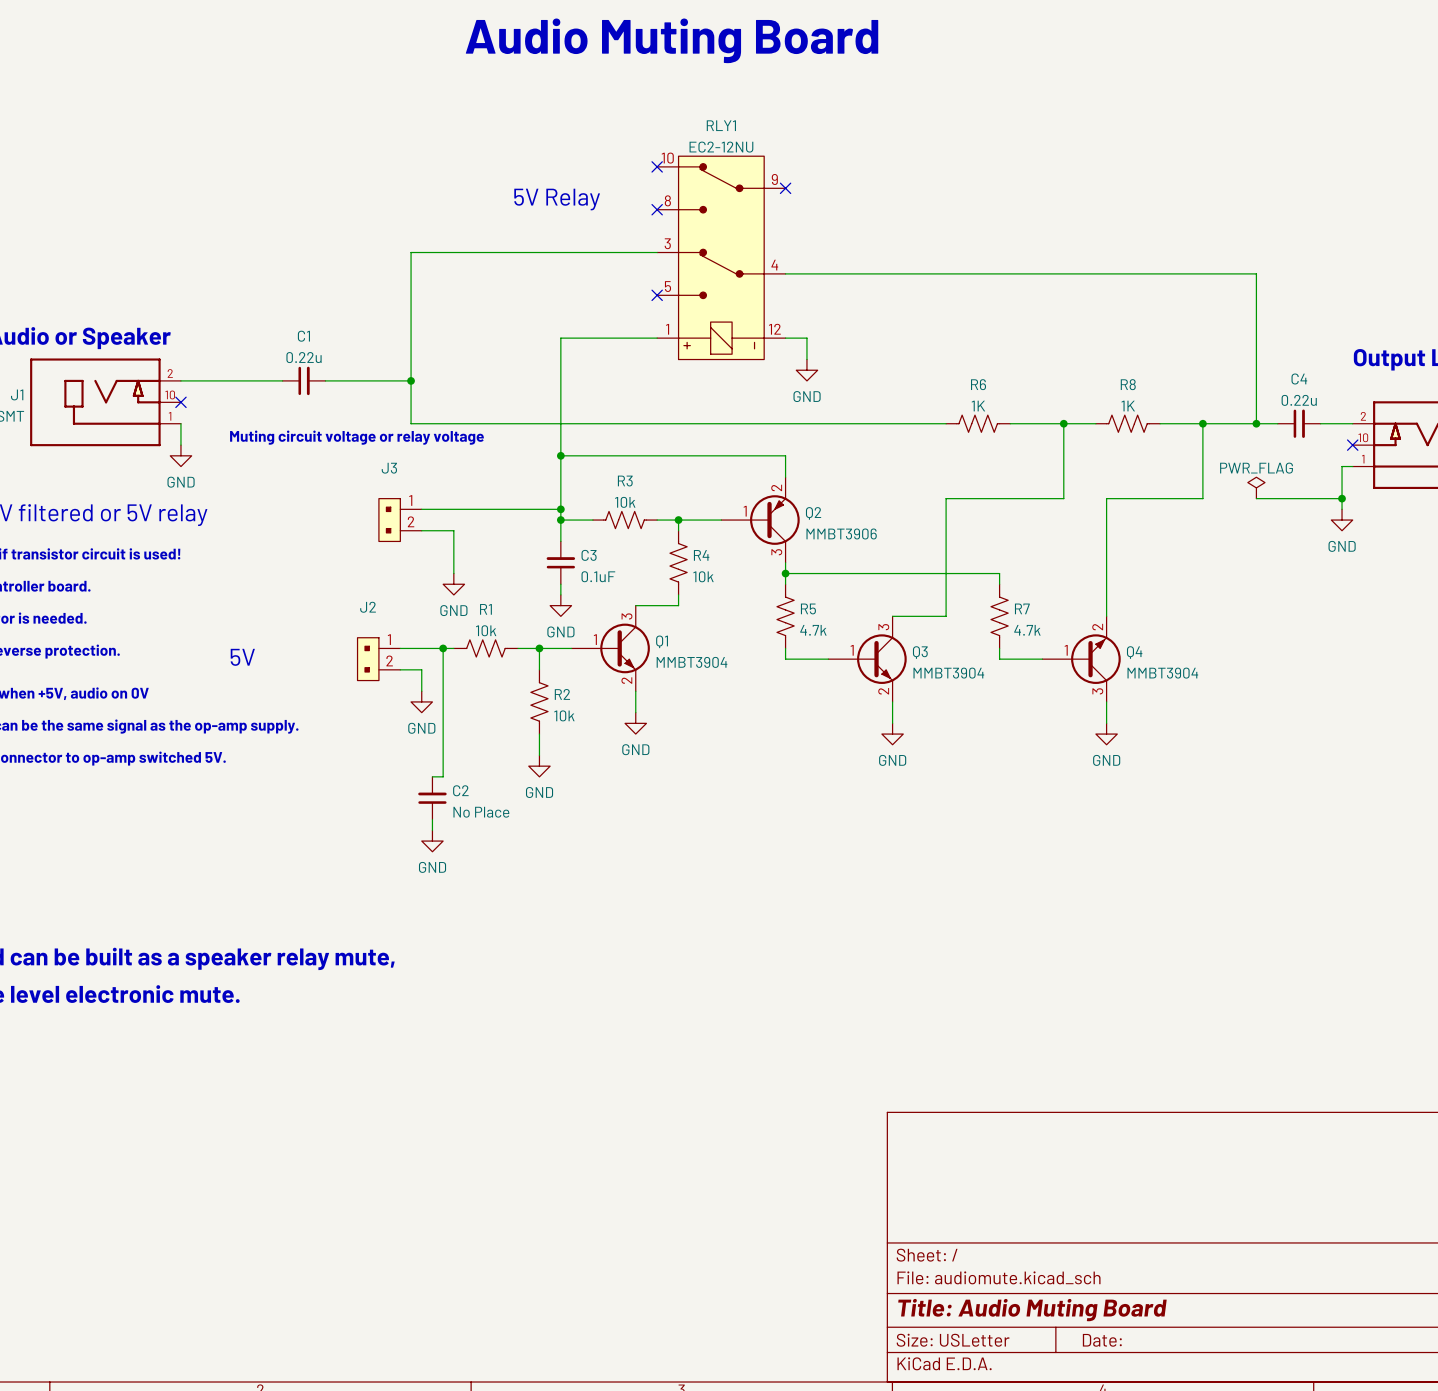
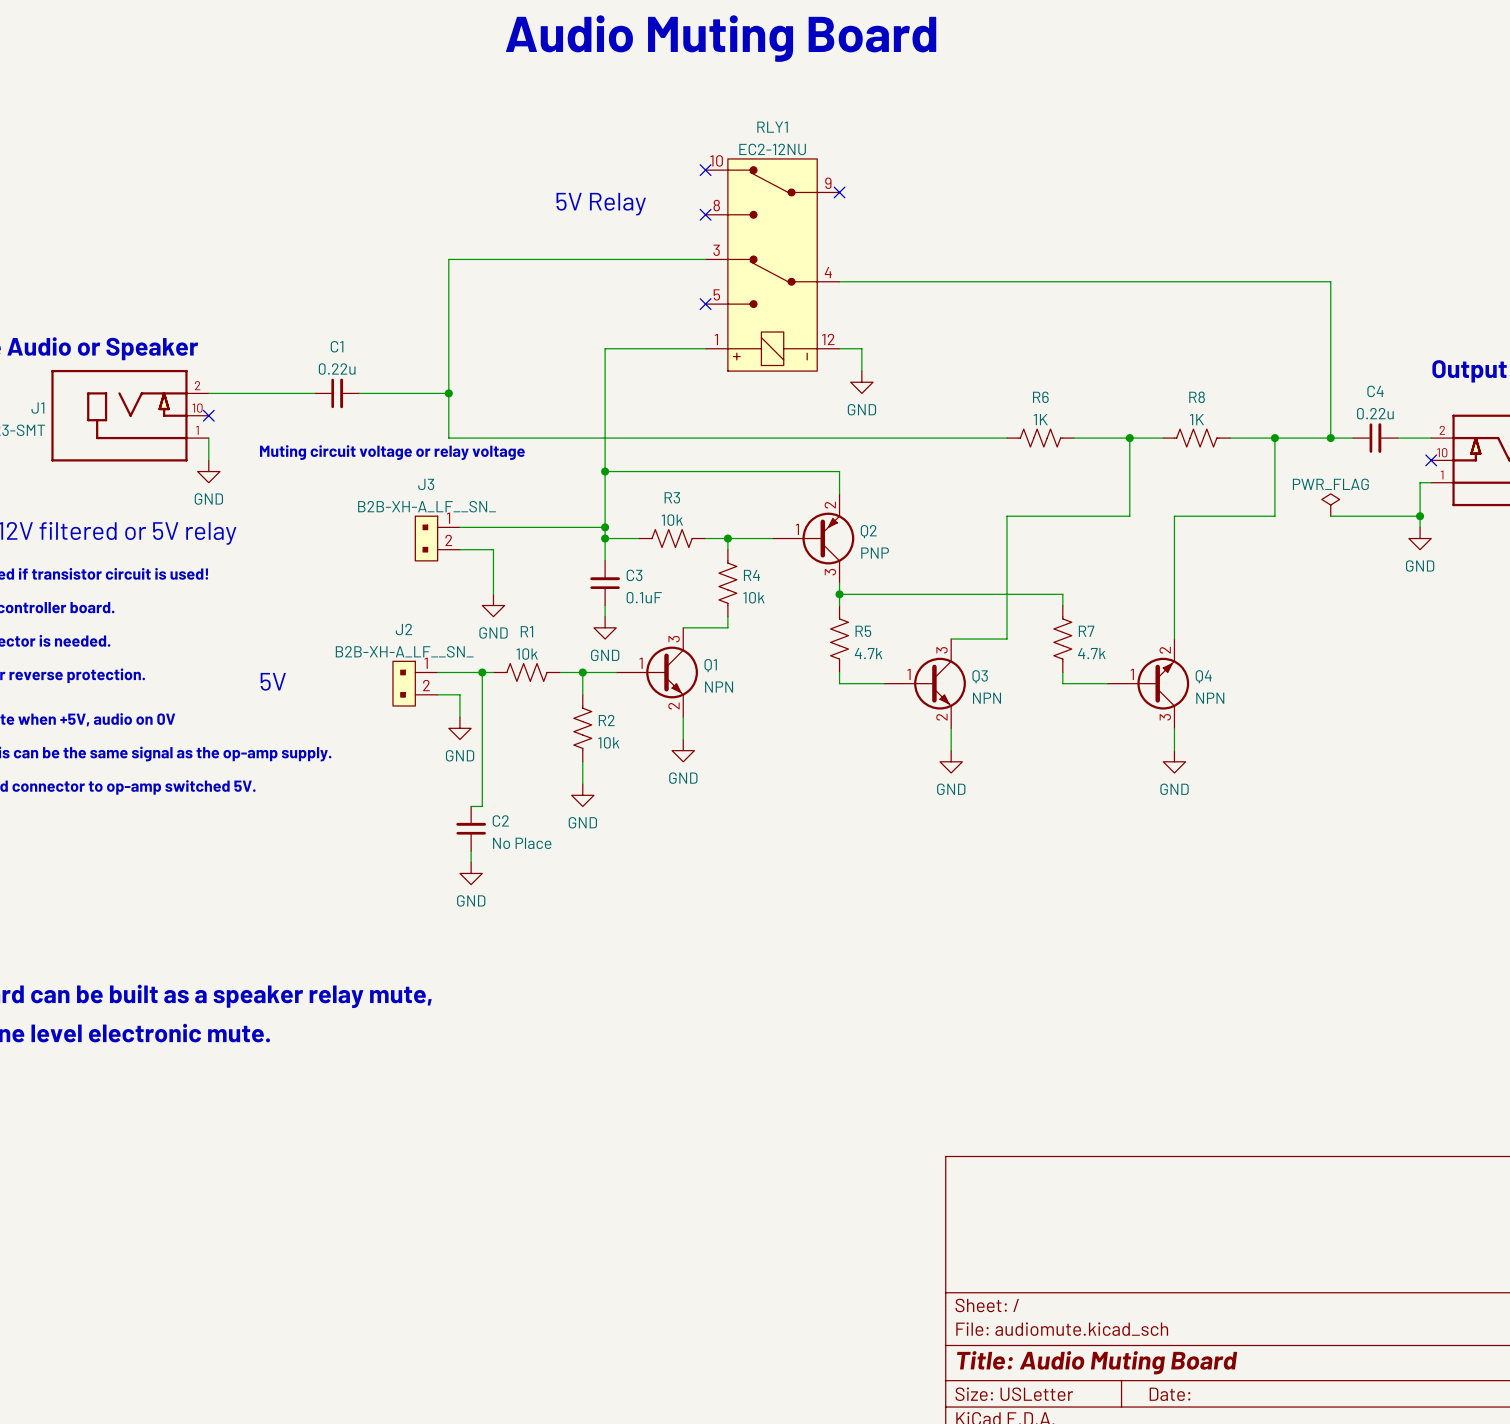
J3 value: none -> B2B-XH-A_LF__SN_ (427, 506)
Q2 value: MMBT3906 (841, 533) -> PNP (875, 553)
J2 value: none -> B2B-XH-A_LF__SN_ (404, 651)
Q1 value: MMBT3904 (692, 662) -> NPN (719, 687)
Q3 value: MMBT3904 (948, 673) -> NPN (987, 698)
Q4 value: MMBT3904 (1162, 673) -> NPN (1210, 698)

